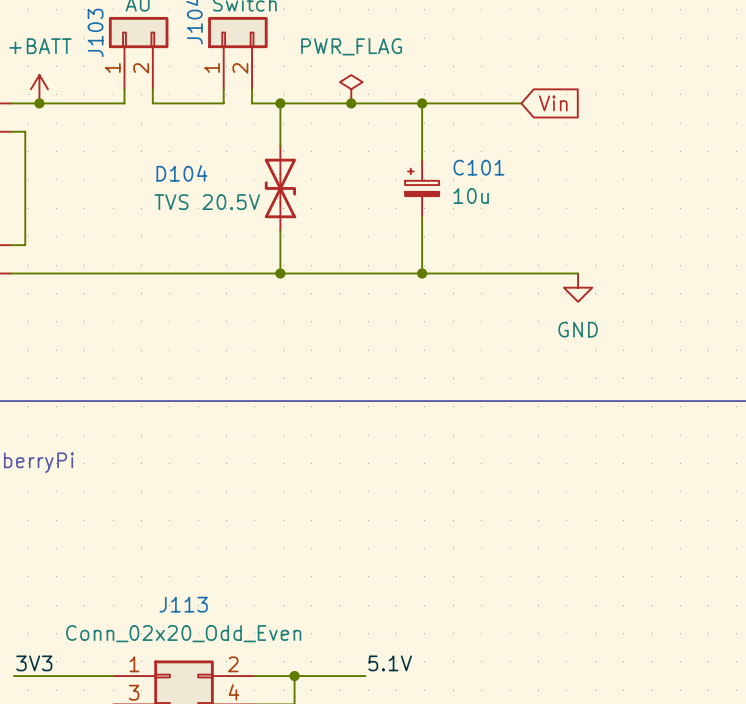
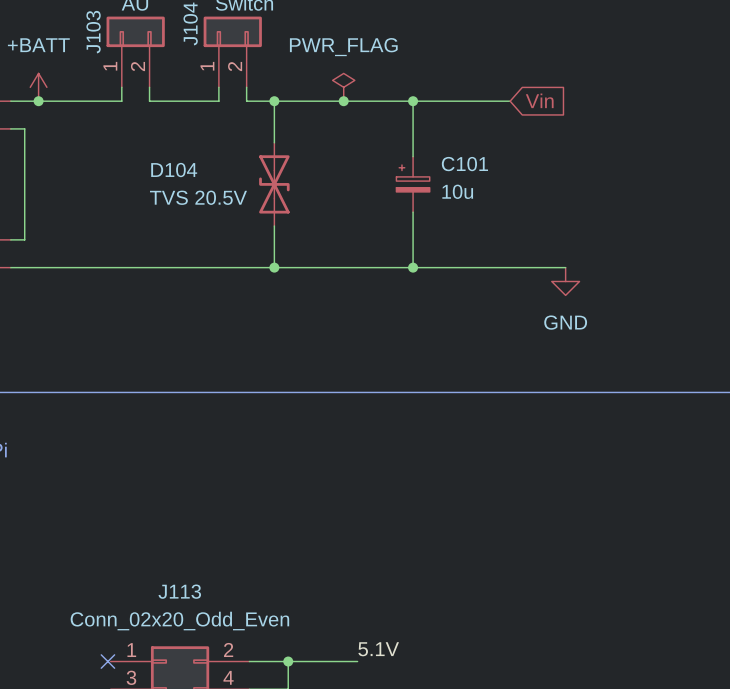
label: 3V3 (34, 663) -> none
wire: (13, 676) (113, 676) -> none
no-connect mark: none -> (107, 661)

